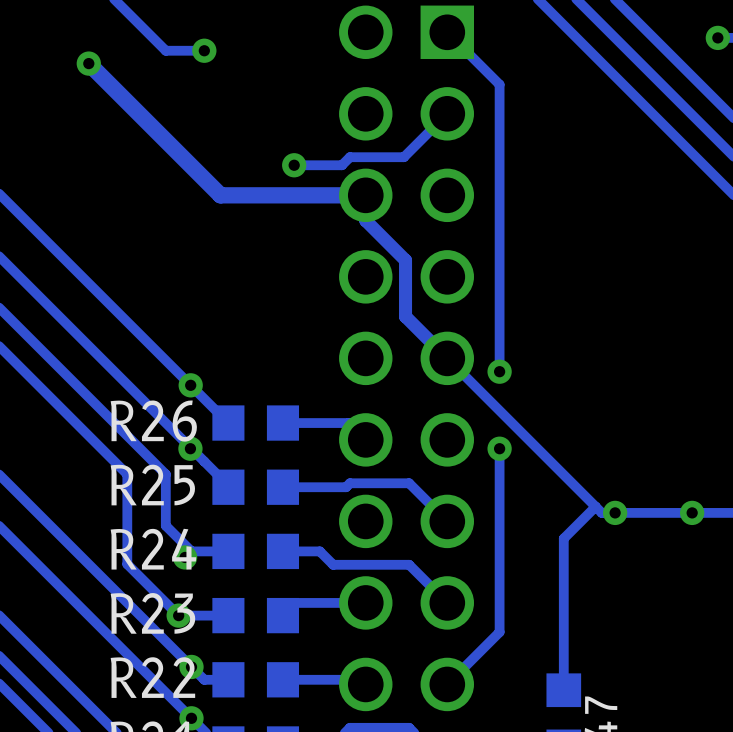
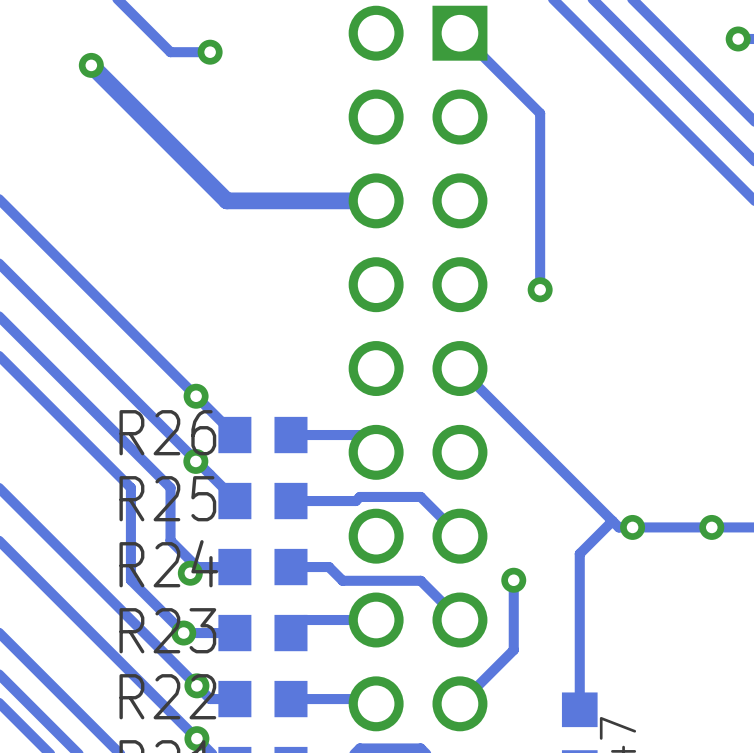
track: (499, 84) (499, 371) -> (513, 87) (540, 113) (540, 289)
track: (447, 113) (403, 157) (349, 157) (341, 165) (294, 165) -> none
via: (294, 165) -> none
track: (365, 195) (365, 220) (405, 260) (405, 316) (447, 358) -> none
via: none -> (540, 289)
via: (499, 371) -> none
track: (499, 448) (499, 564) -> none
via: (499, 448) -> none
via: none -> (513, 580)

